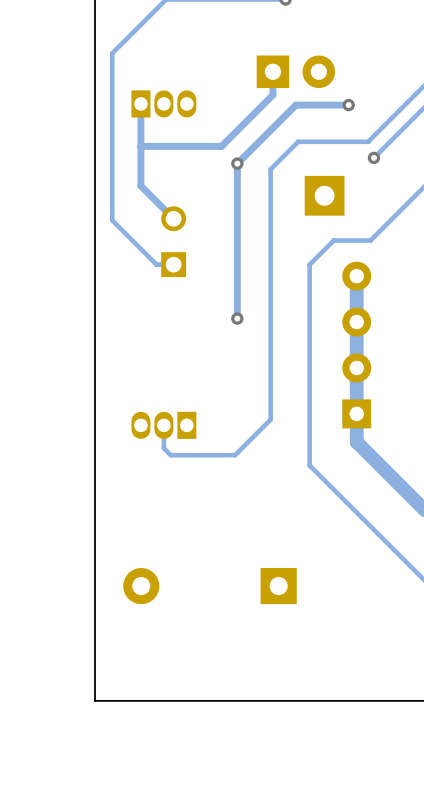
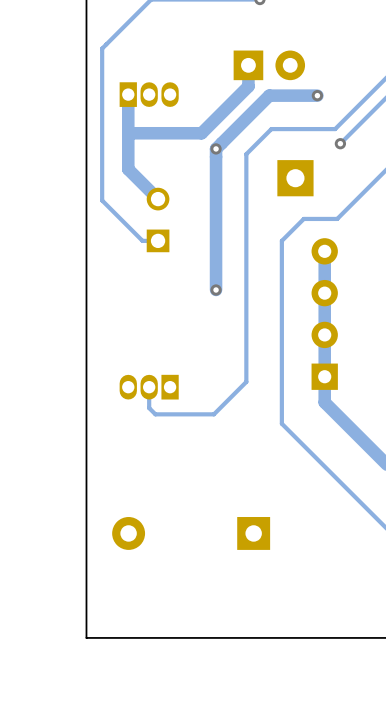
track width: thin (272, 71) (272, 94) (221, 146) (140, 146) -> thick (248, 65) (248, 86) (201, 133) (128, 133)
track width: thin (140, 103) (140, 186) (173, 218) -> thick (128, 94) (128, 169) (158, 199)
track width: thin (348, 105) (295, 105) (237, 163) (237, 318) -> thick (317, 95) (269, 95) (216, 148) (216, 290)

